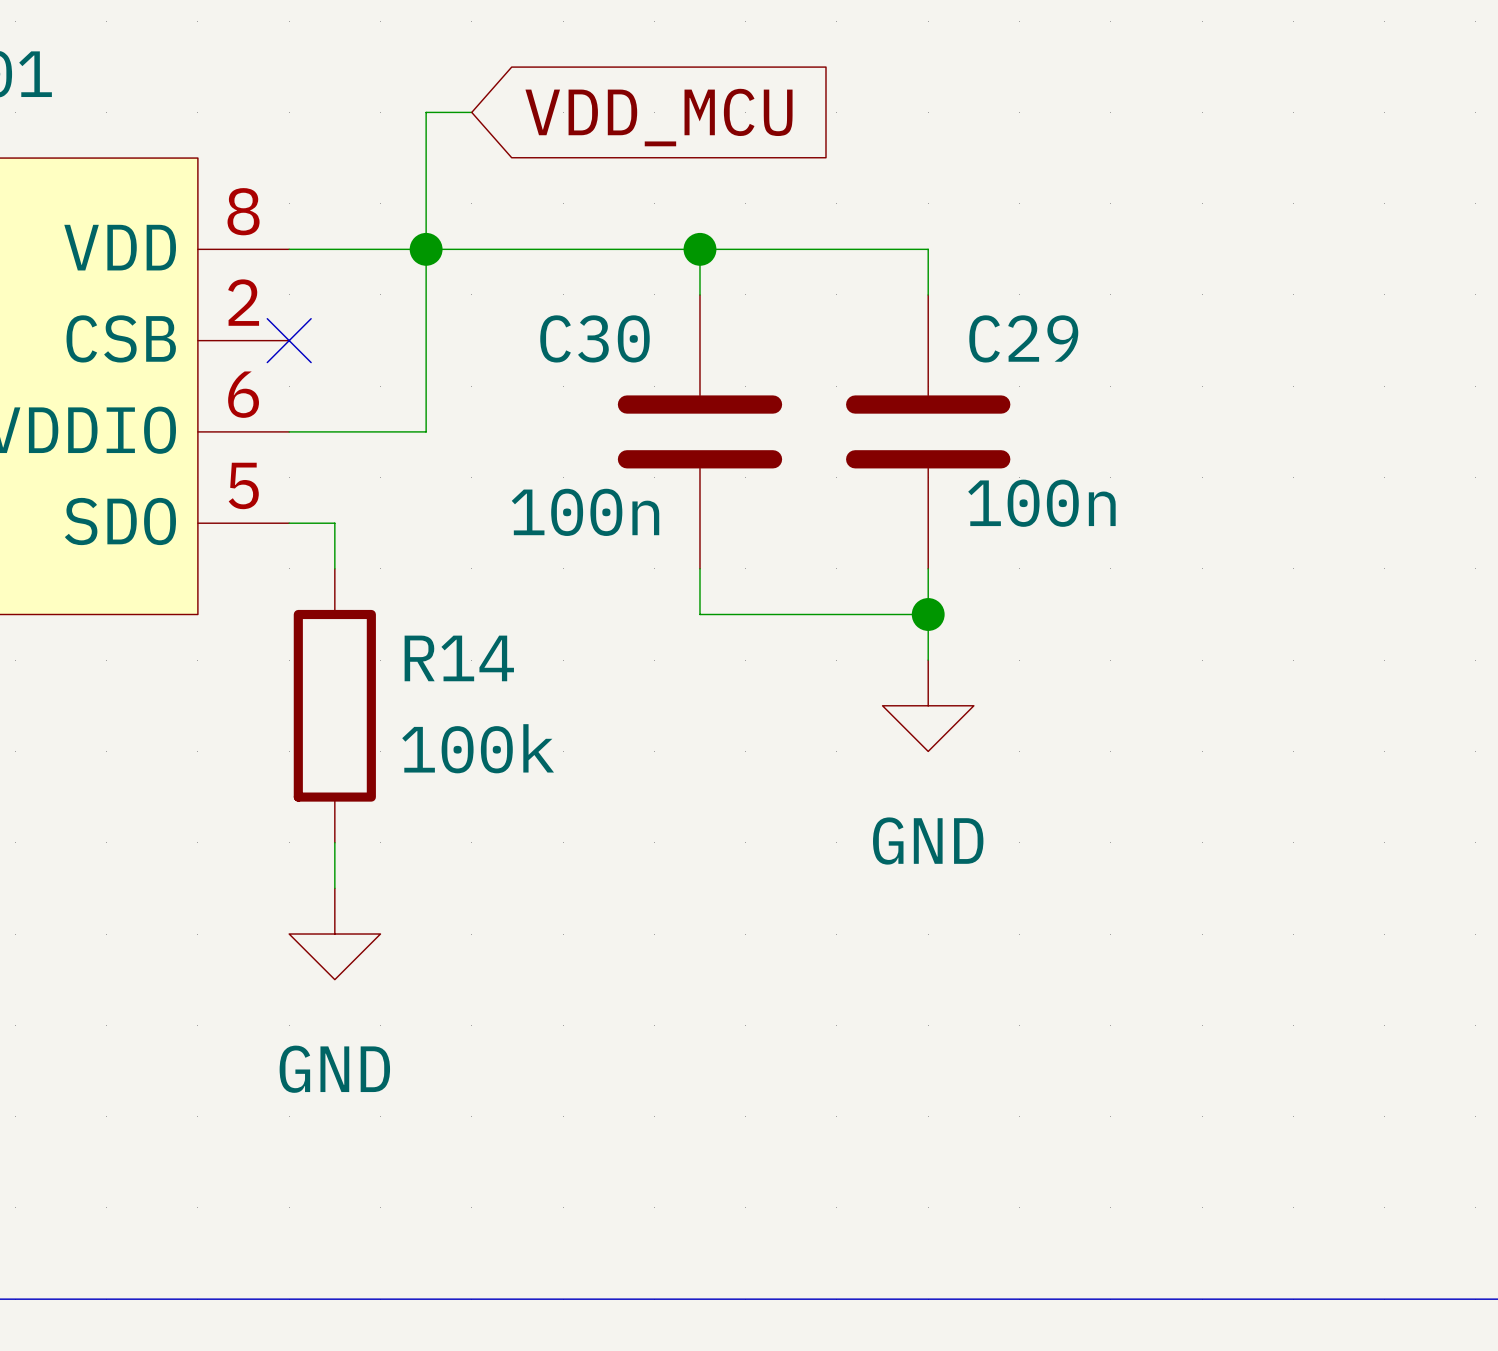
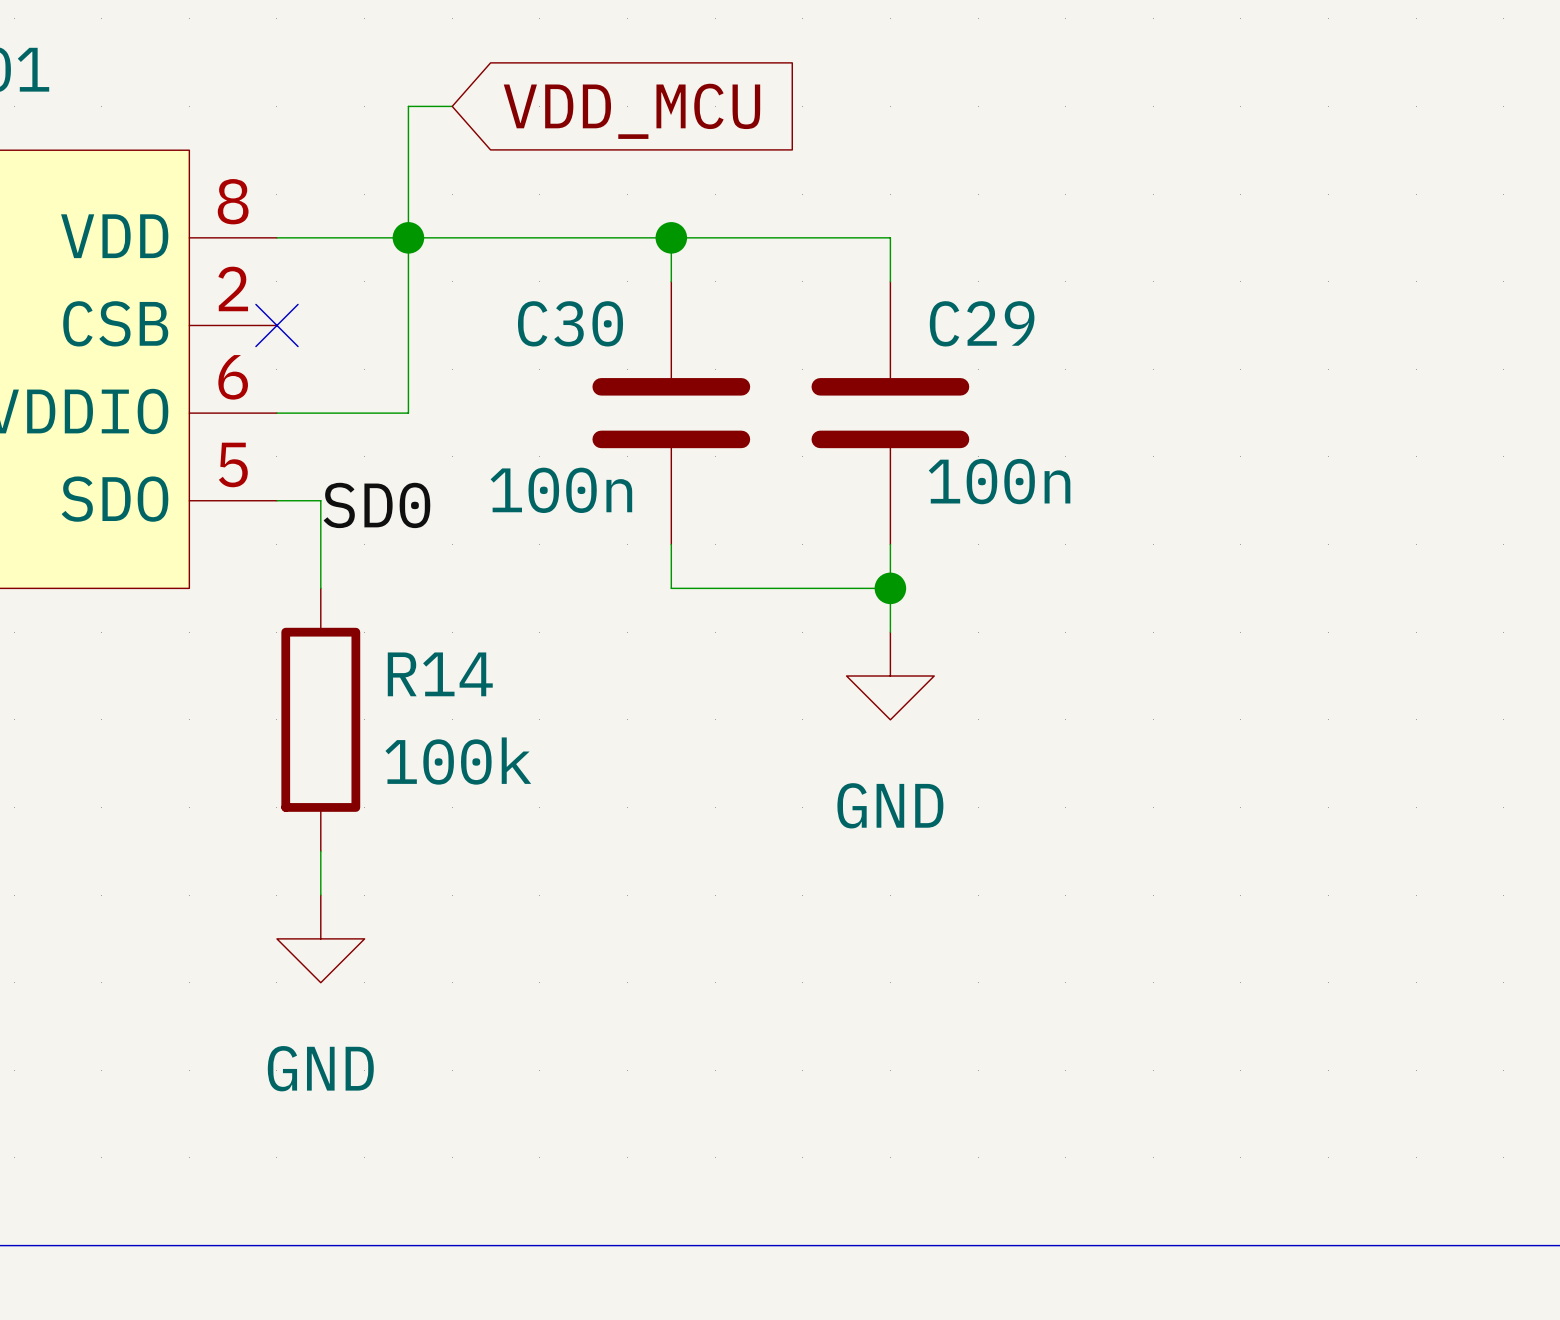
label: none -> SD0 (376, 505)
R14 position: (334, 705) -> (320, 719)
power symbol position: GND (334, 934) -> GND (320, 938)

